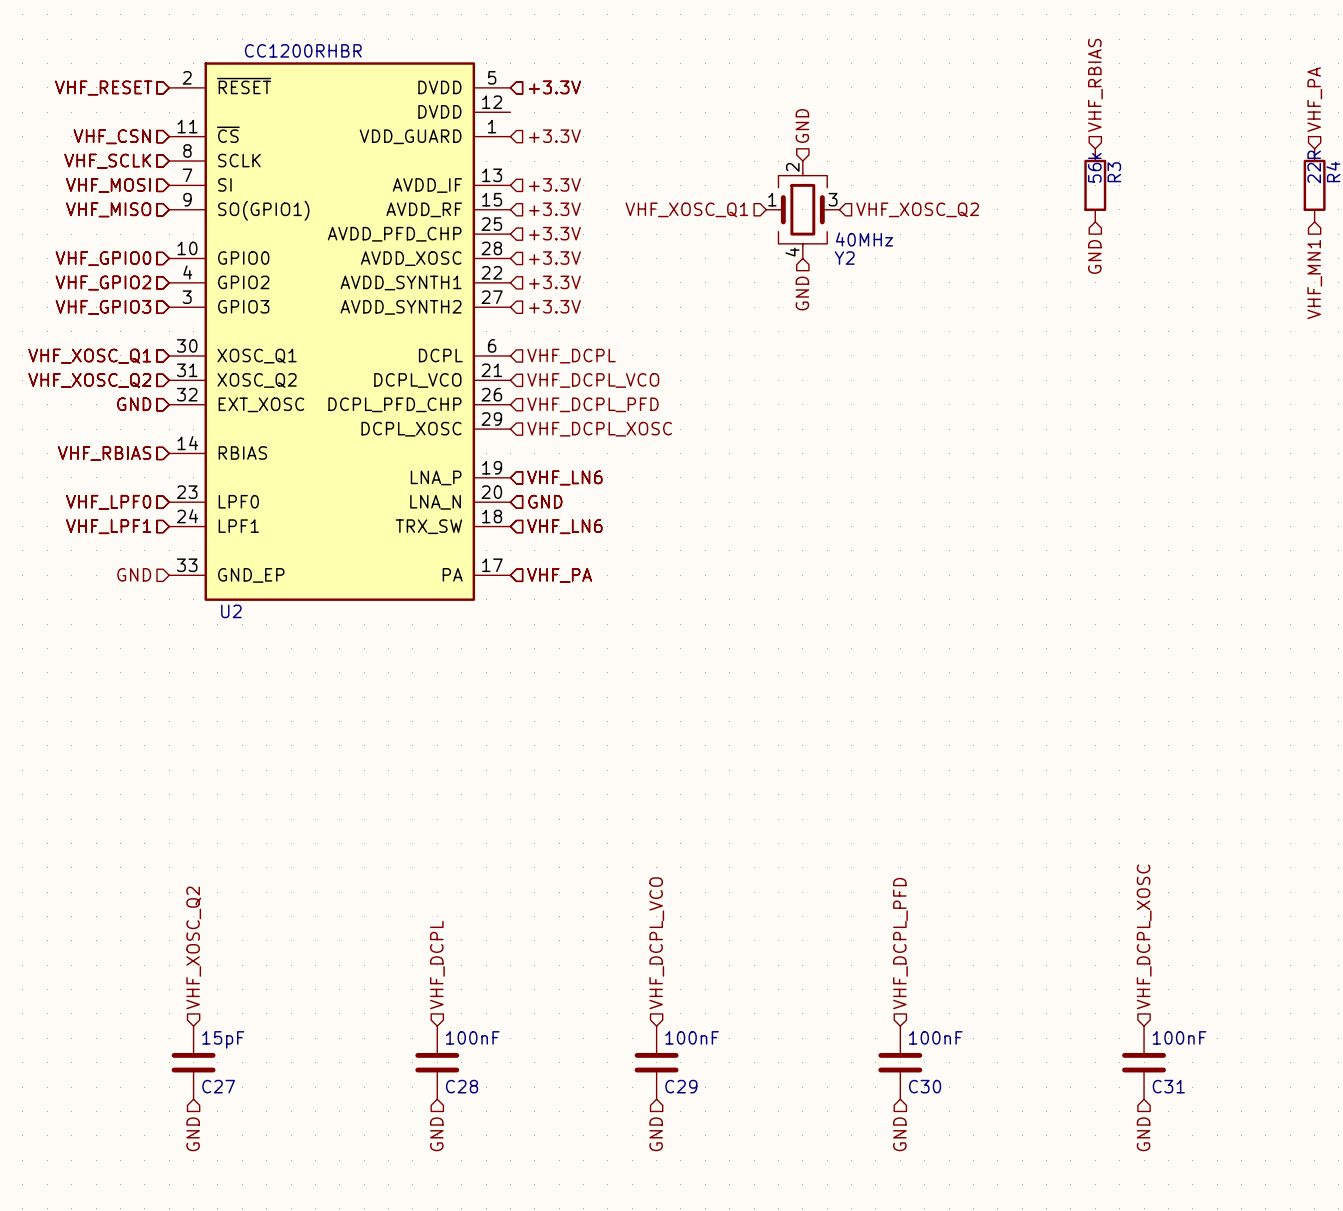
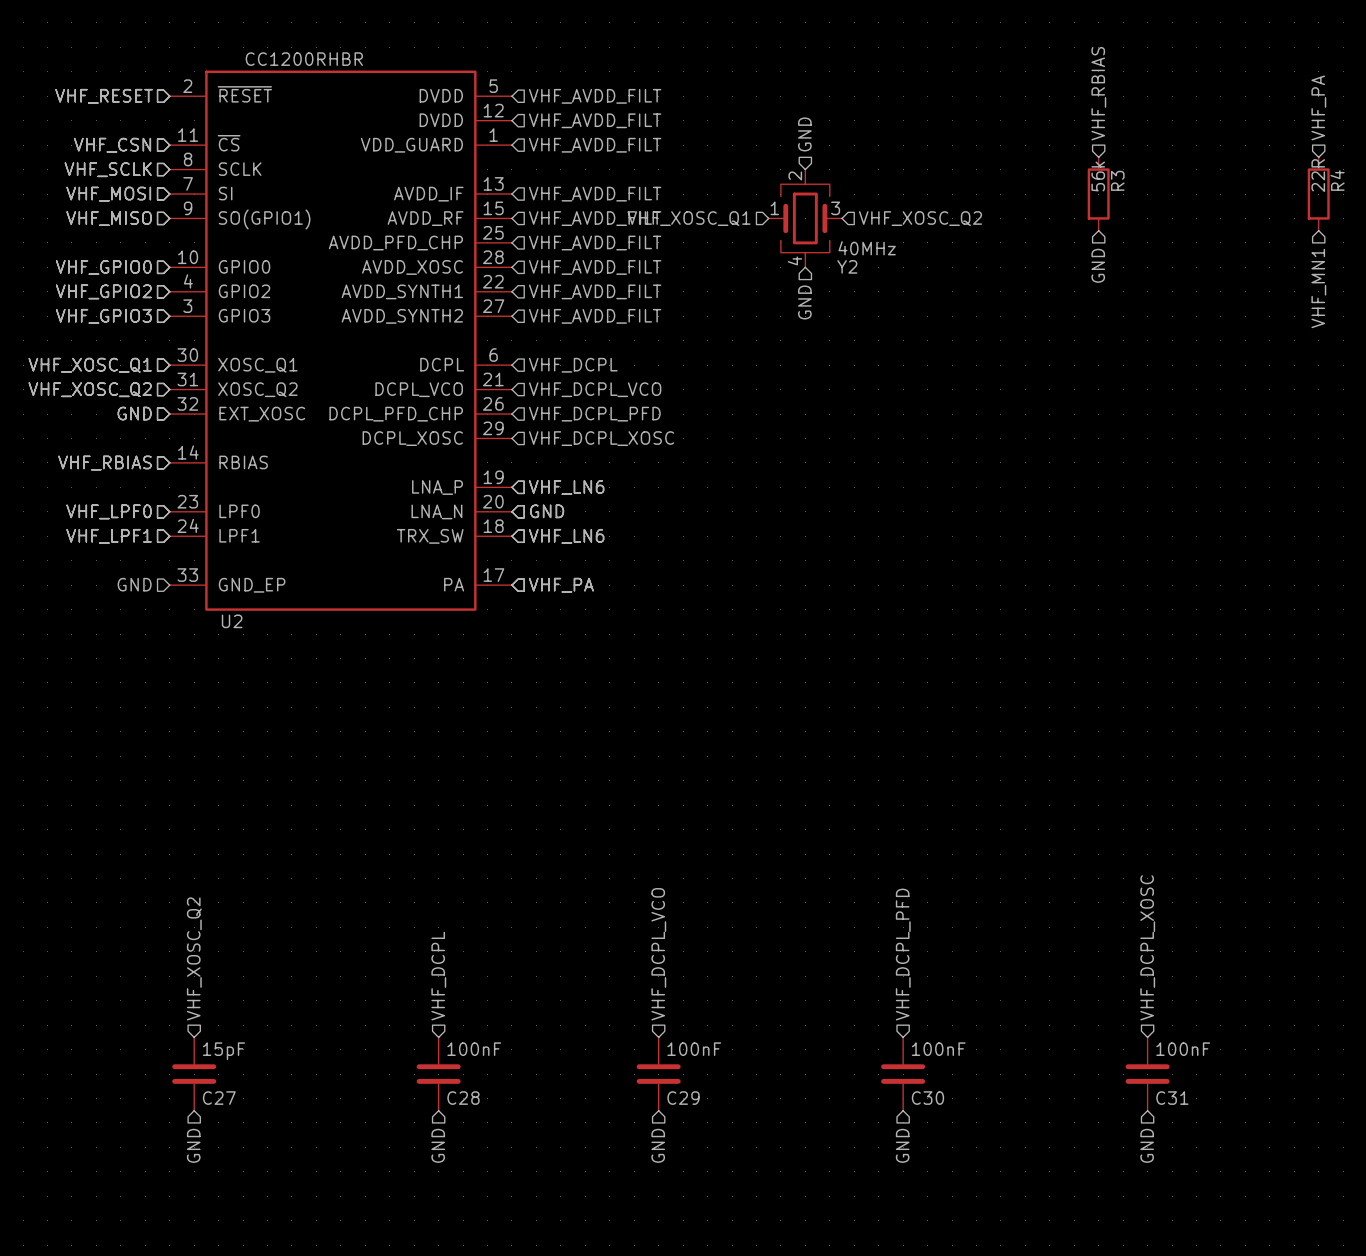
hierarchical label: +3.3V (554, 87) -> VHF_AVDD_FILT (595, 96)
hierarchical label: none -> VHF_AVDD_FILT (595, 120)
hierarchical label: +3.3V (554, 136) -> VHF_AVDD_FILT (595, 145)
hierarchical label: +3.3V (554, 184) -> VHF_AVDD_FILT (595, 194)
hierarchical label: +3.3V (554, 209) -> VHF_AVDD_FILT (595, 218)
hierarchical label: +3.3V (554, 233) -> VHF_AVDD_FILT (595, 243)
hierarchical label: +3.3V (554, 258) -> VHF_AVDD_FILT (595, 267)
hierarchical label: +3.3V (554, 282) -> VHF_AVDD_FILT (595, 291)
hierarchical label: +3.3V (554, 306) -> VHF_AVDD_FILT (595, 316)

